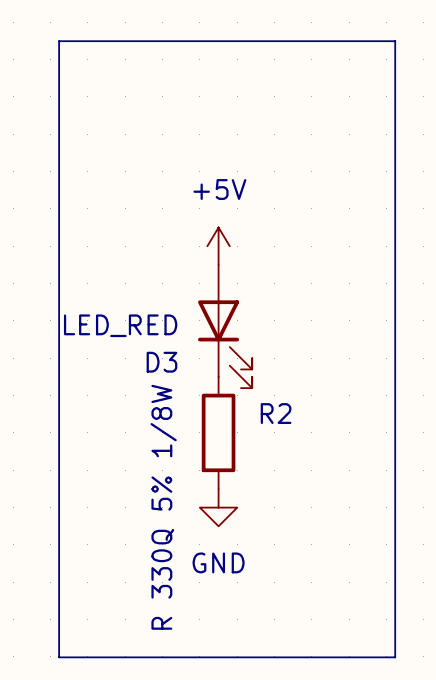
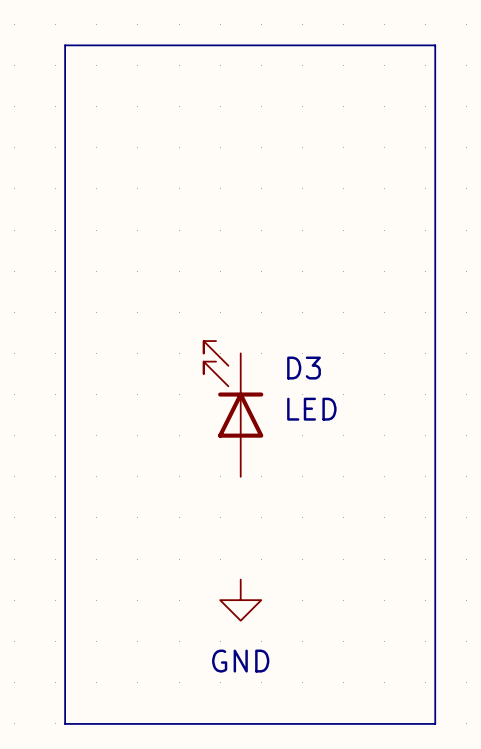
power symbol: +5V (218, 246) -> none
D3 value: LED_RED (120, 325) -> LED (311, 409)
D3 rotation: 0° (225, 344) -> 180° (233, 389)
R2: R 330Q 5% 1/8W (218, 432) -> none
power symbol position: GND (218, 507) -> GND (240, 600)

